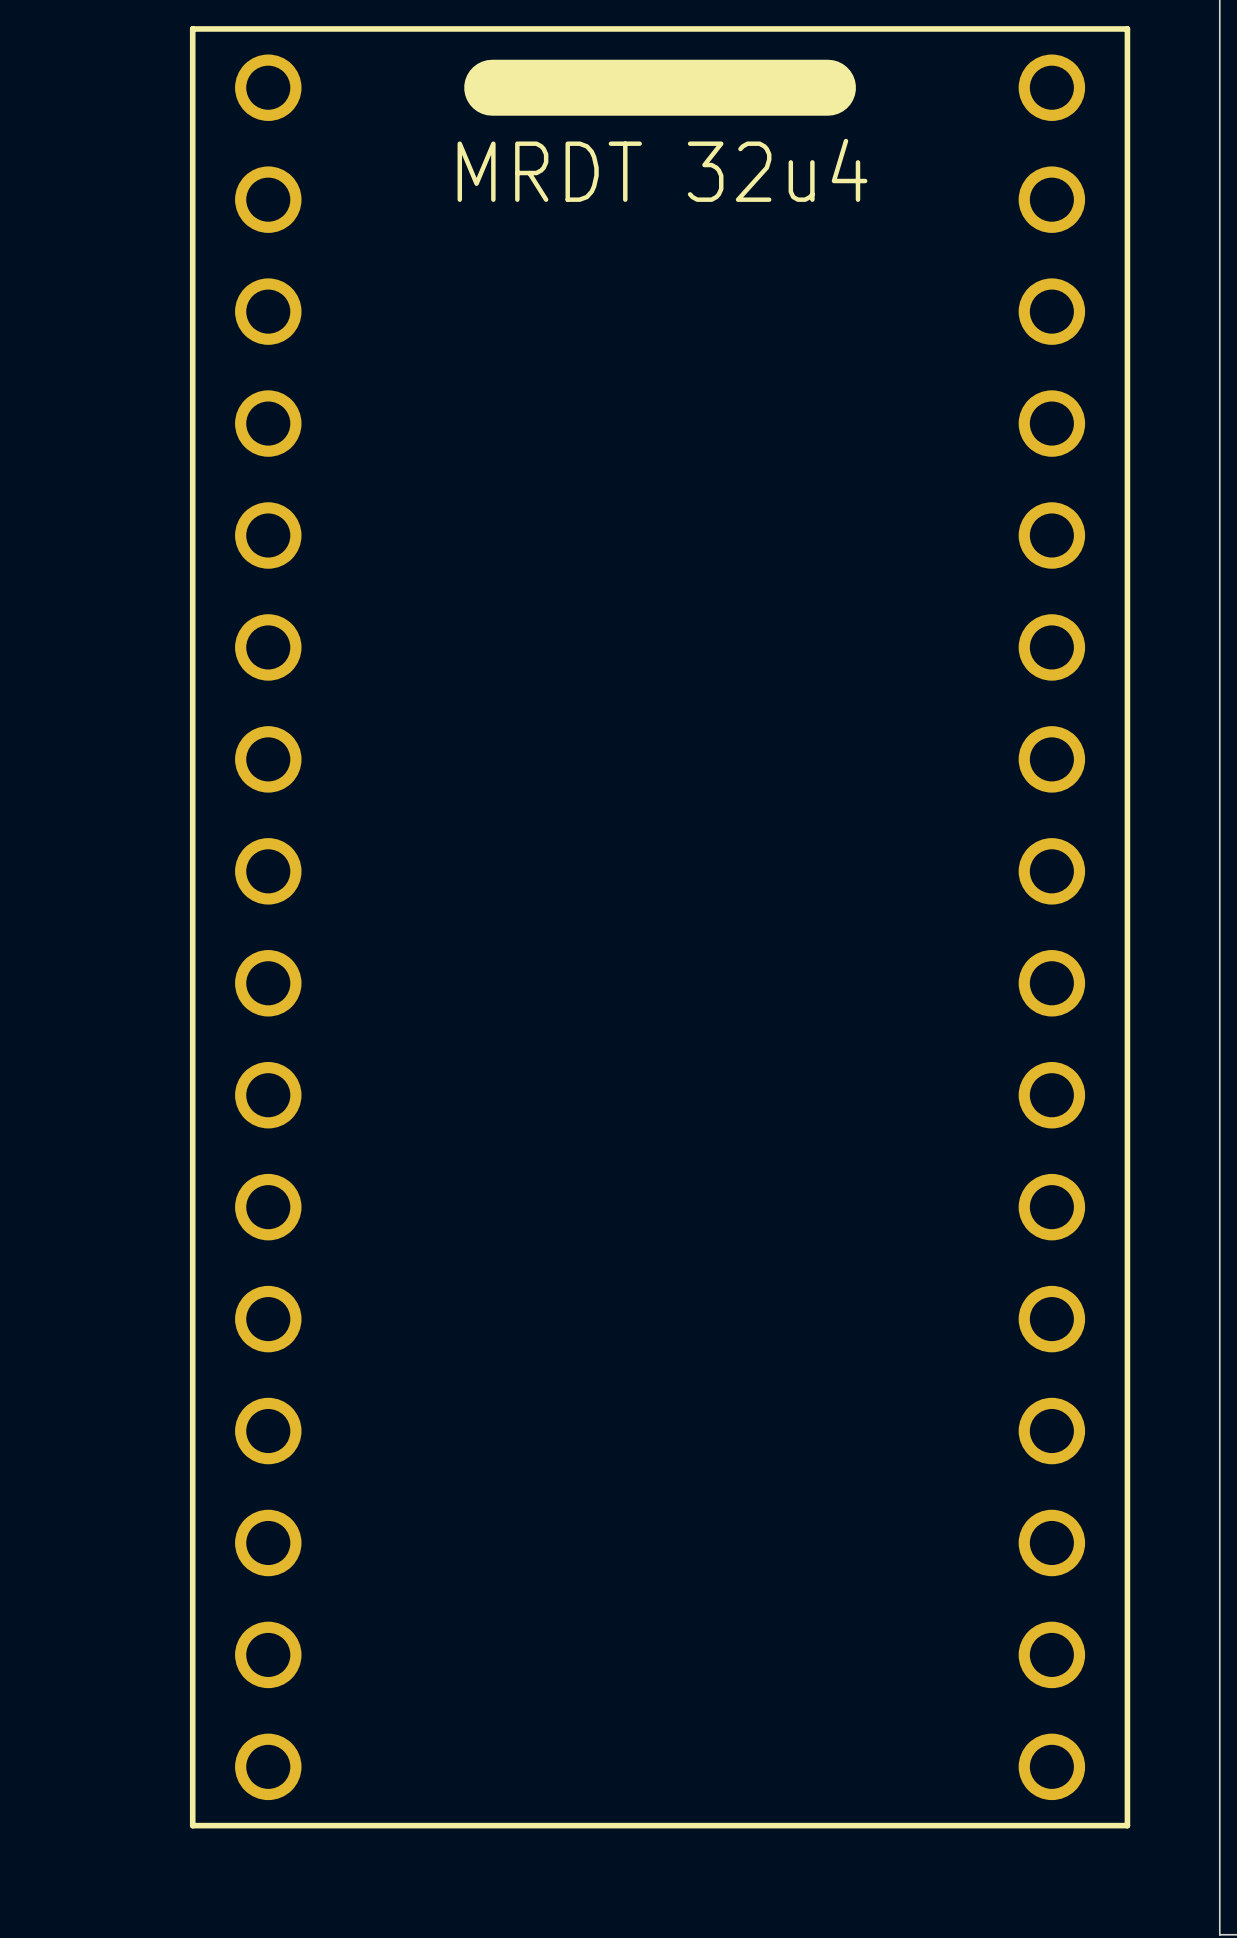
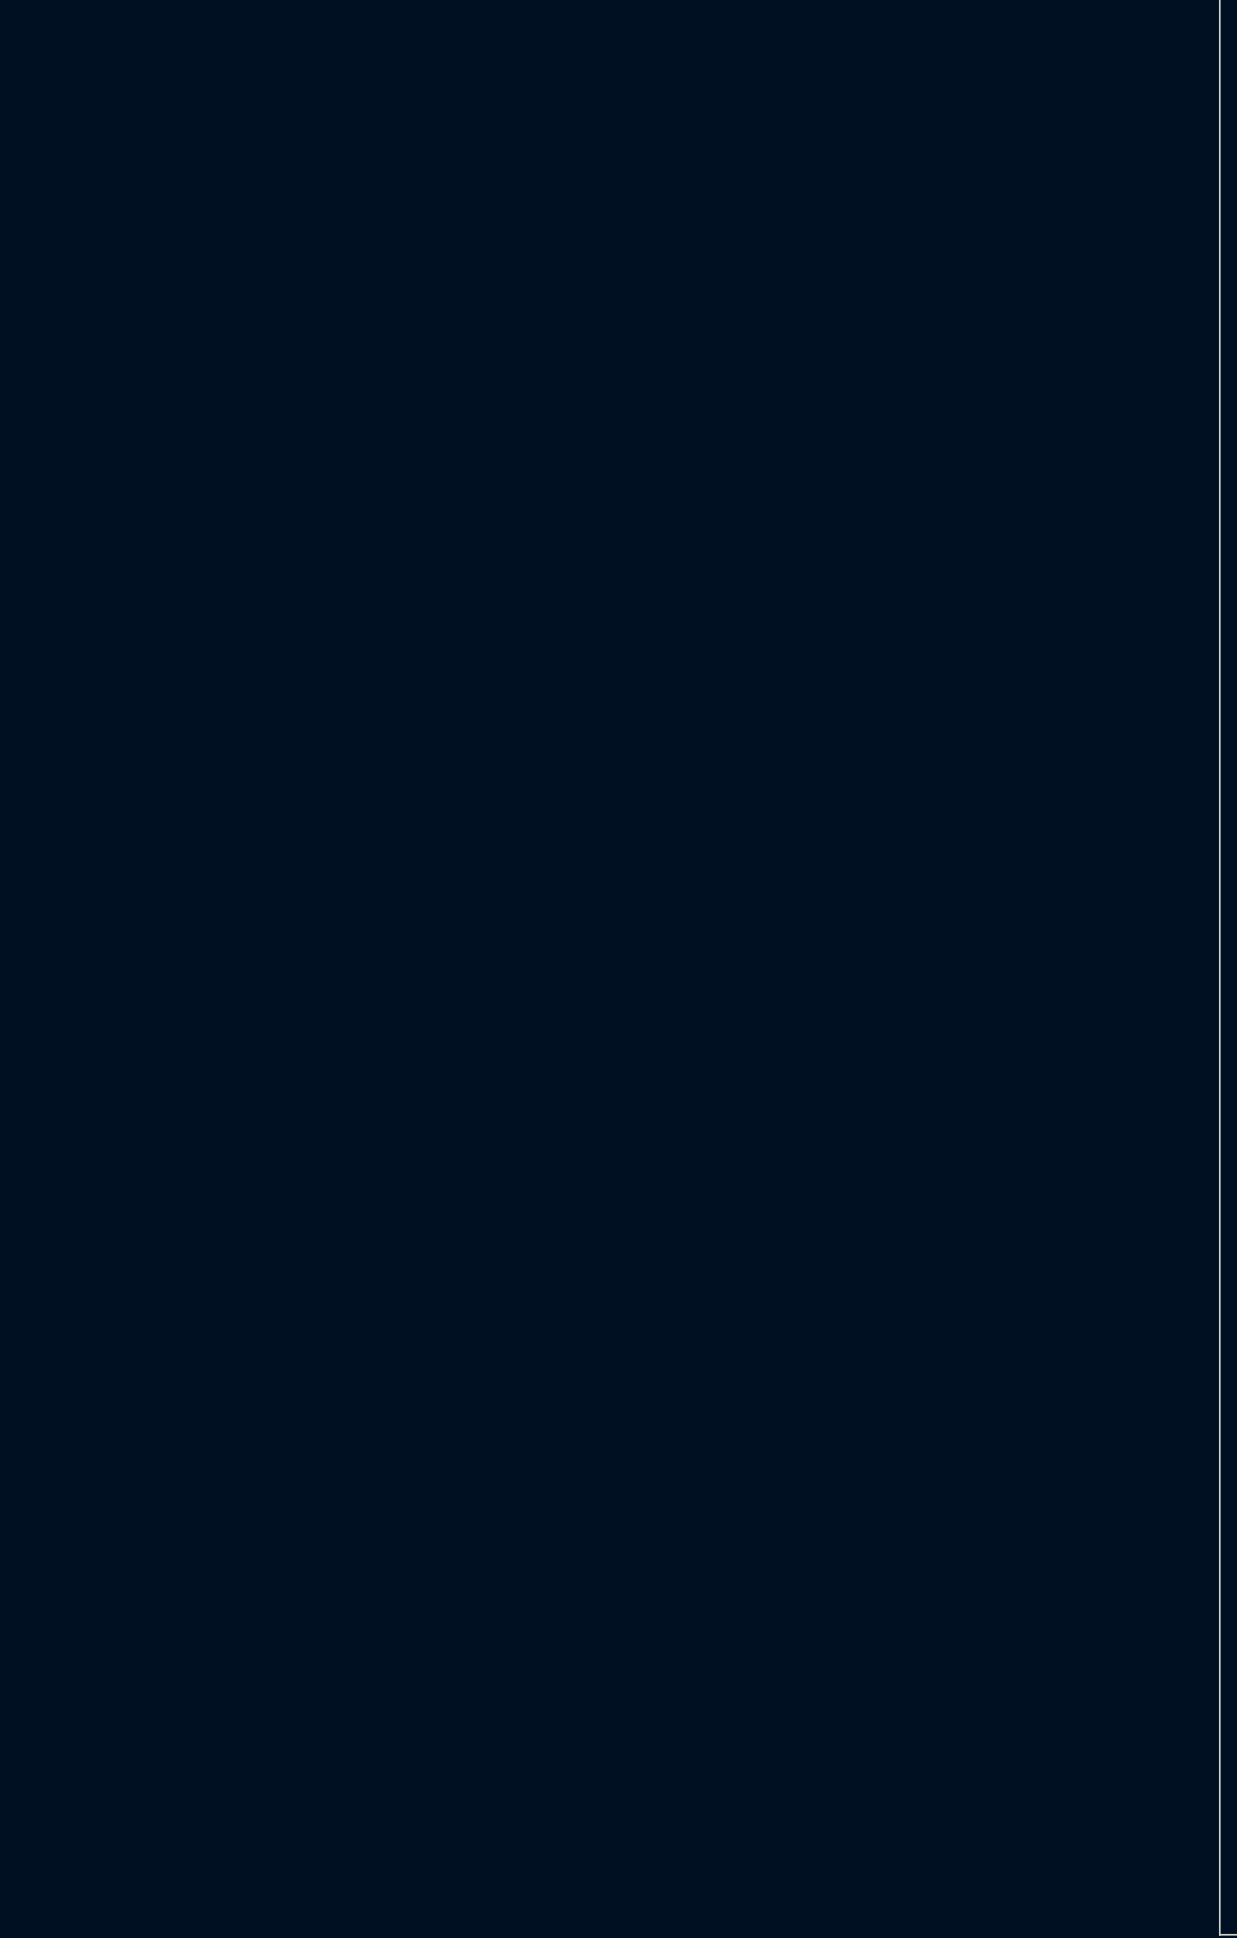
part: (660, 927) -> none

